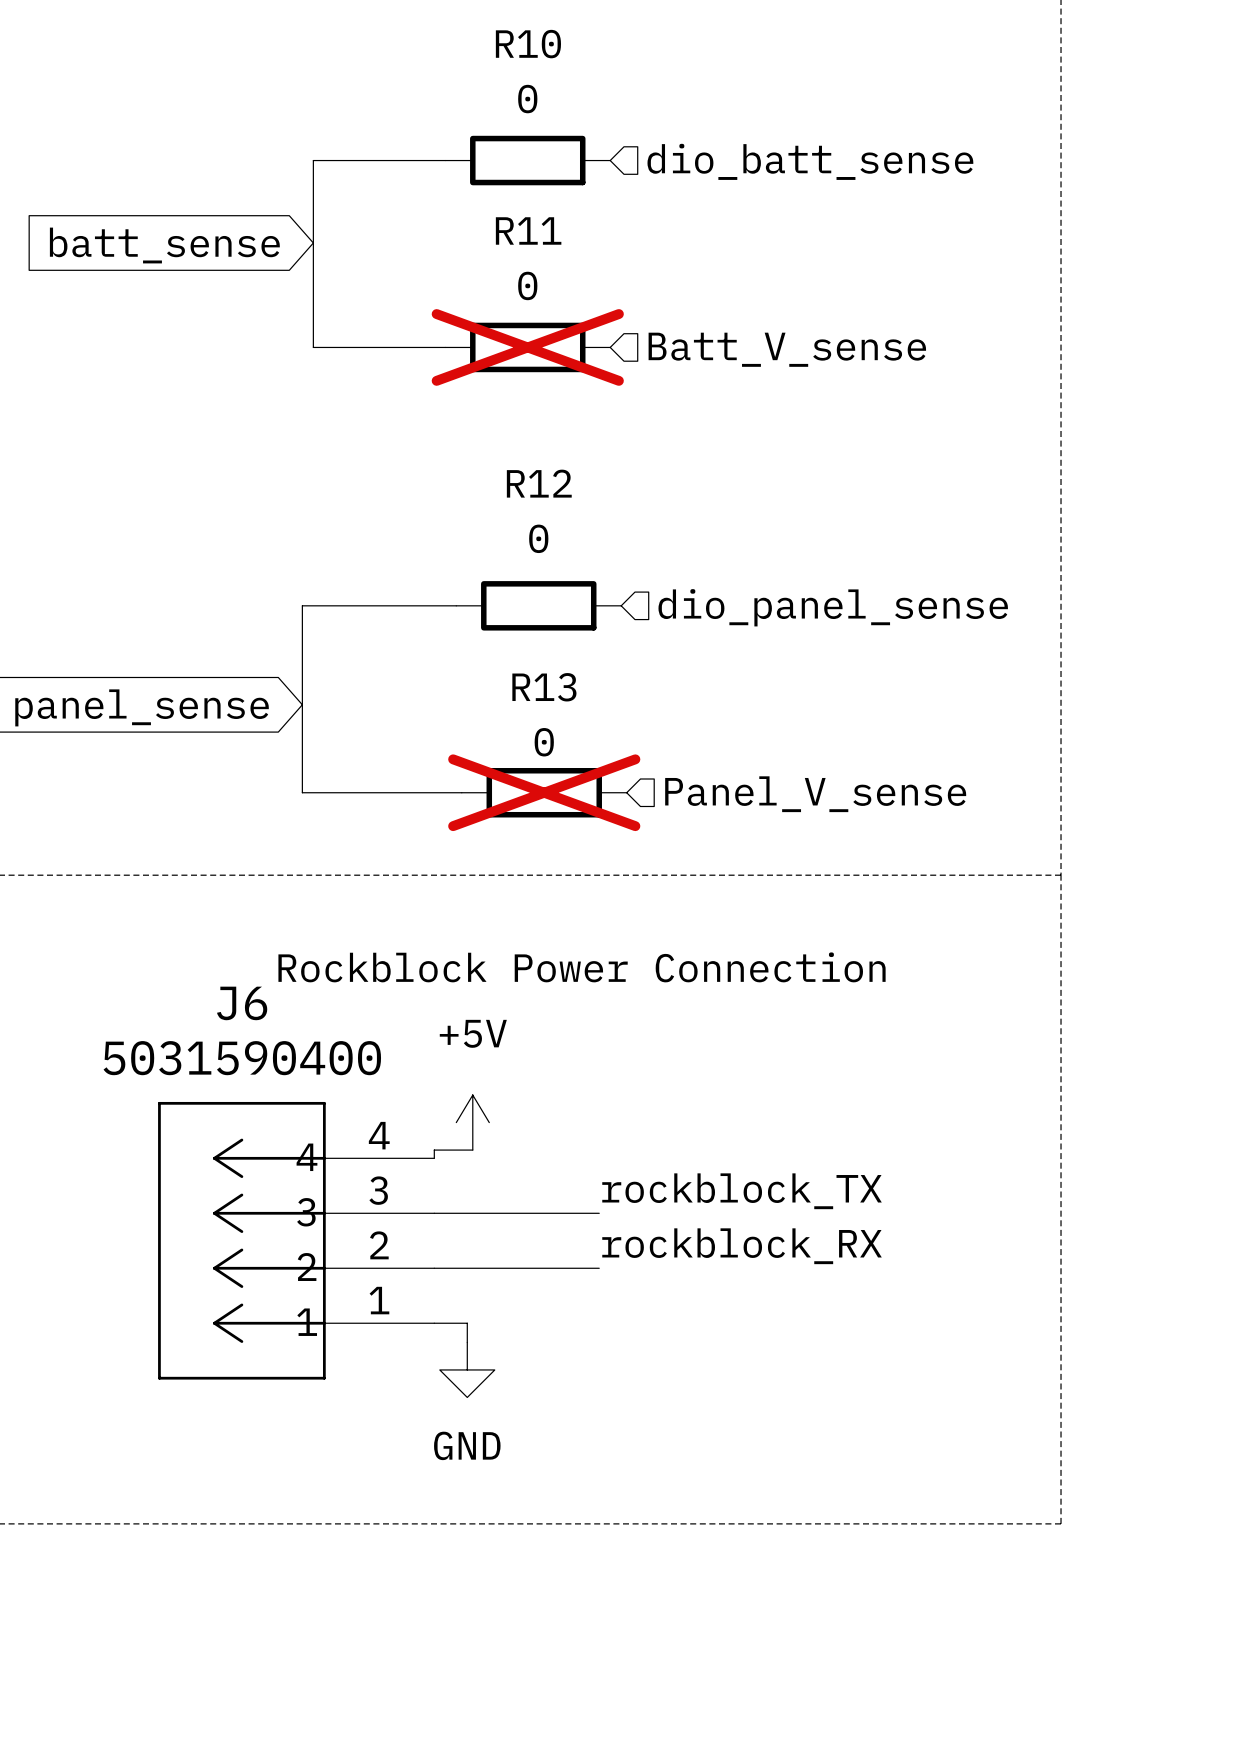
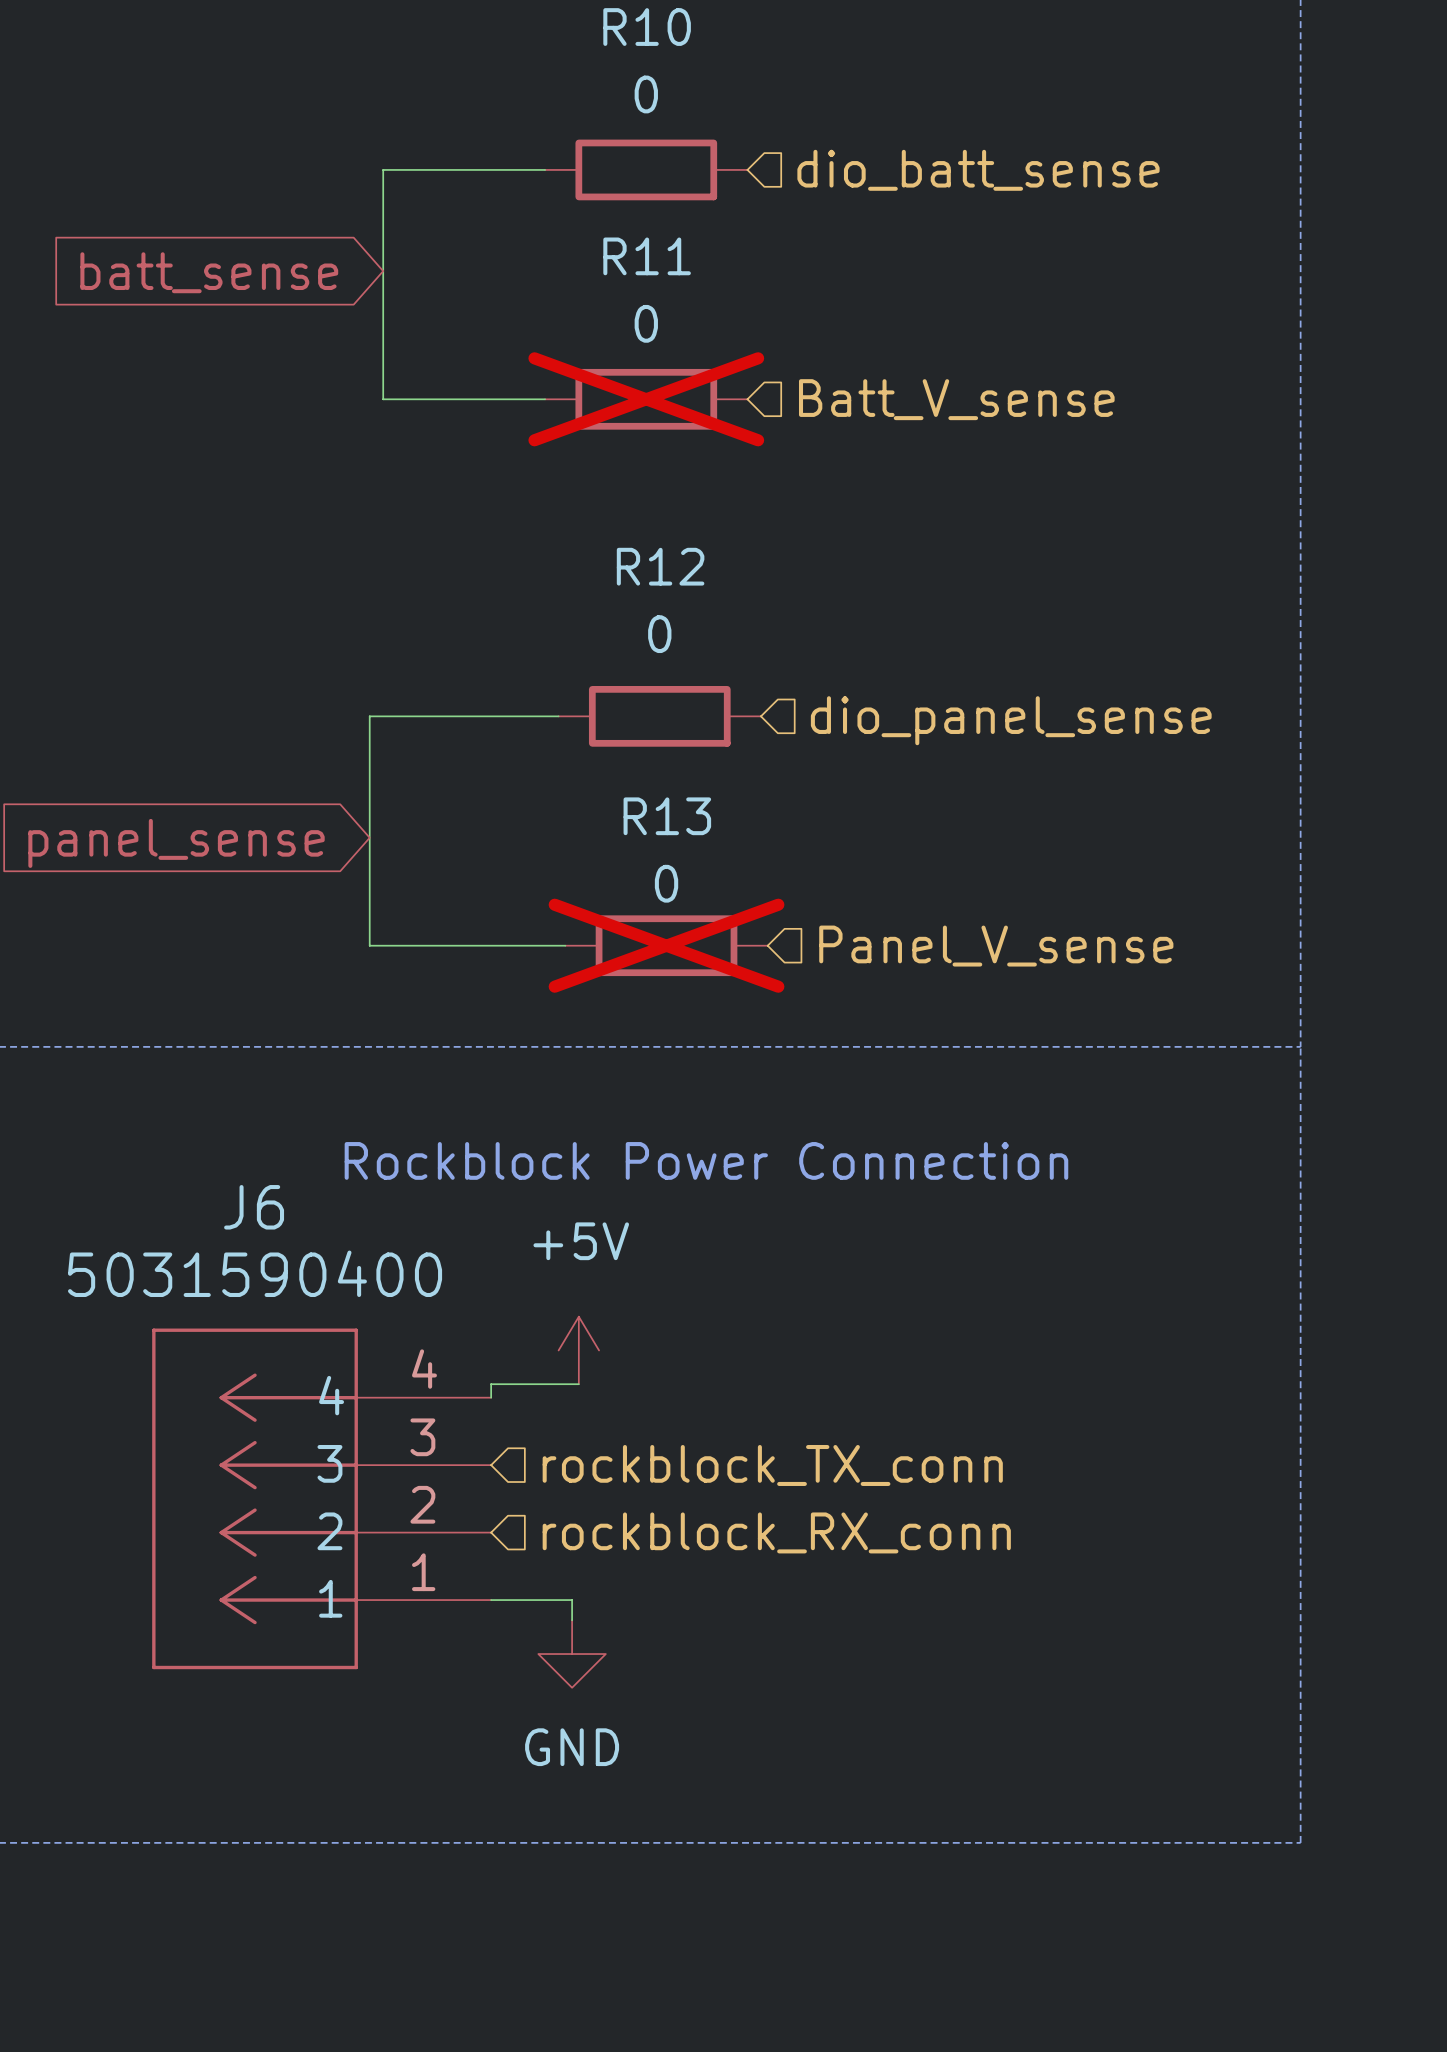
wire: (434, 1150) (434, 1158) -> (531, 1384) (491, 1384) (491, 1397)
label: rockblock_TX (742, 1191) -> none
wire: (434, 1213) (599, 1213) -> none
hierarchical label: none -> rockblock_TX_conn (772, 1465)
J6 position: (296, 1240) -> (321, 1498)
label: rockblock_RX (742, 1246) -> none
wire: (434, 1268) (599, 1268) -> none
hierarchical label: none -> rockblock_RX_conn (776, 1532)
wire: (434, 1323) (467, 1323) (467, 1325) -> (491, 1600) (572, 1600)

